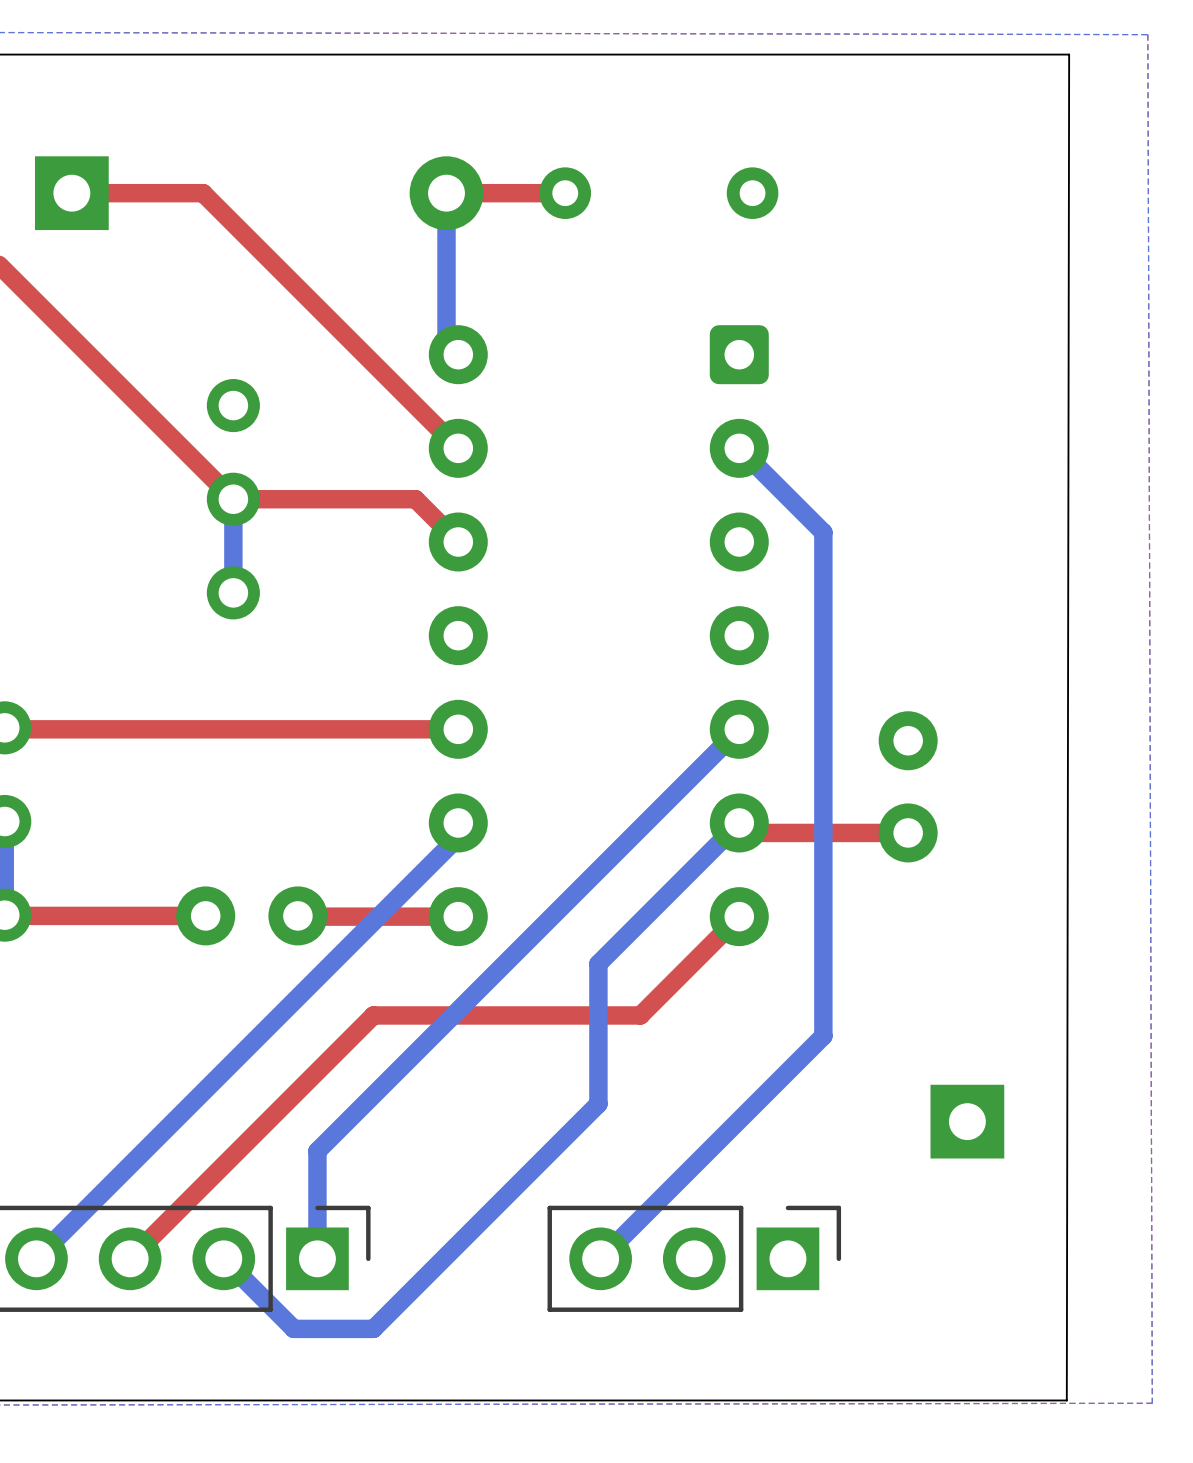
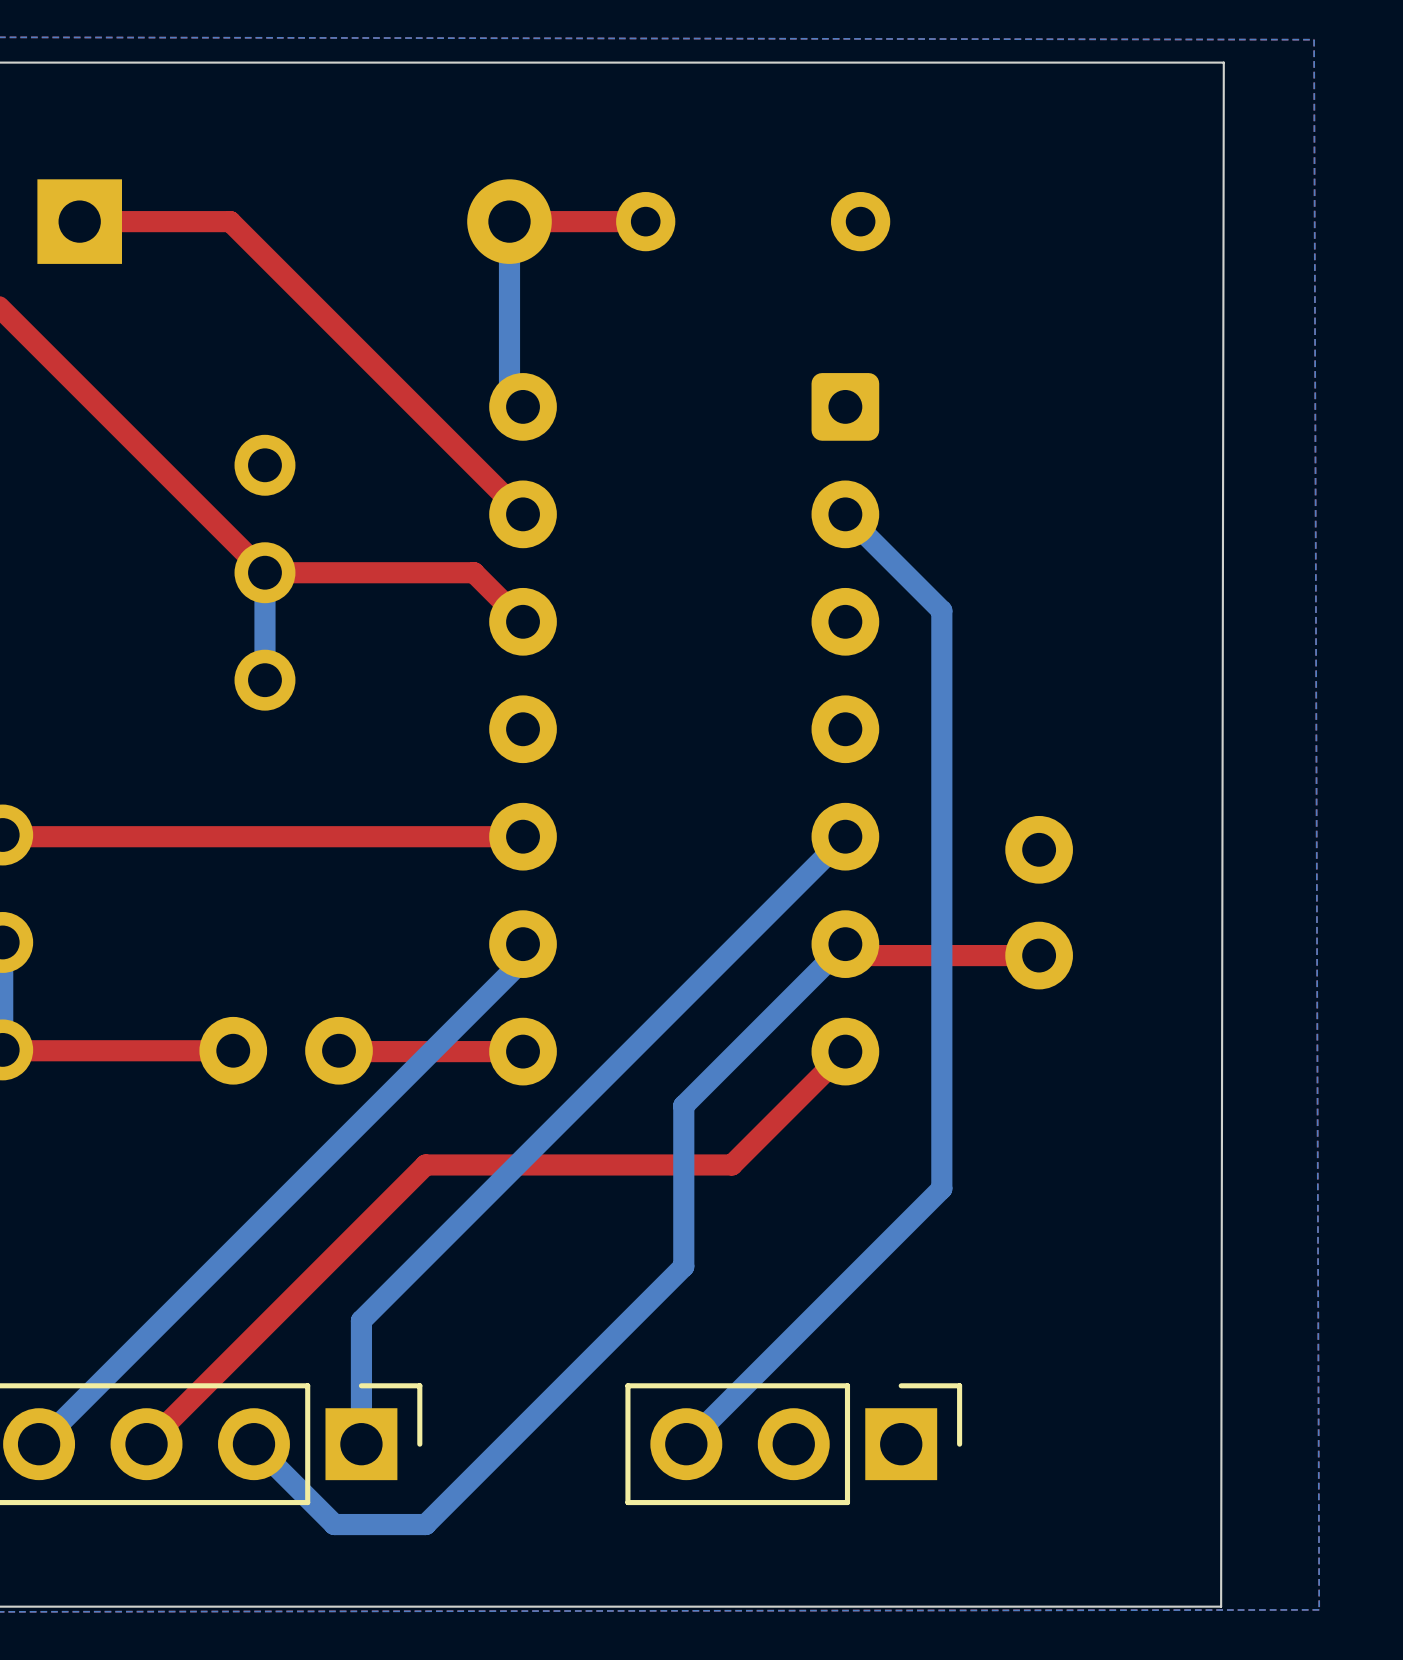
part: (967, 1121) -> none

